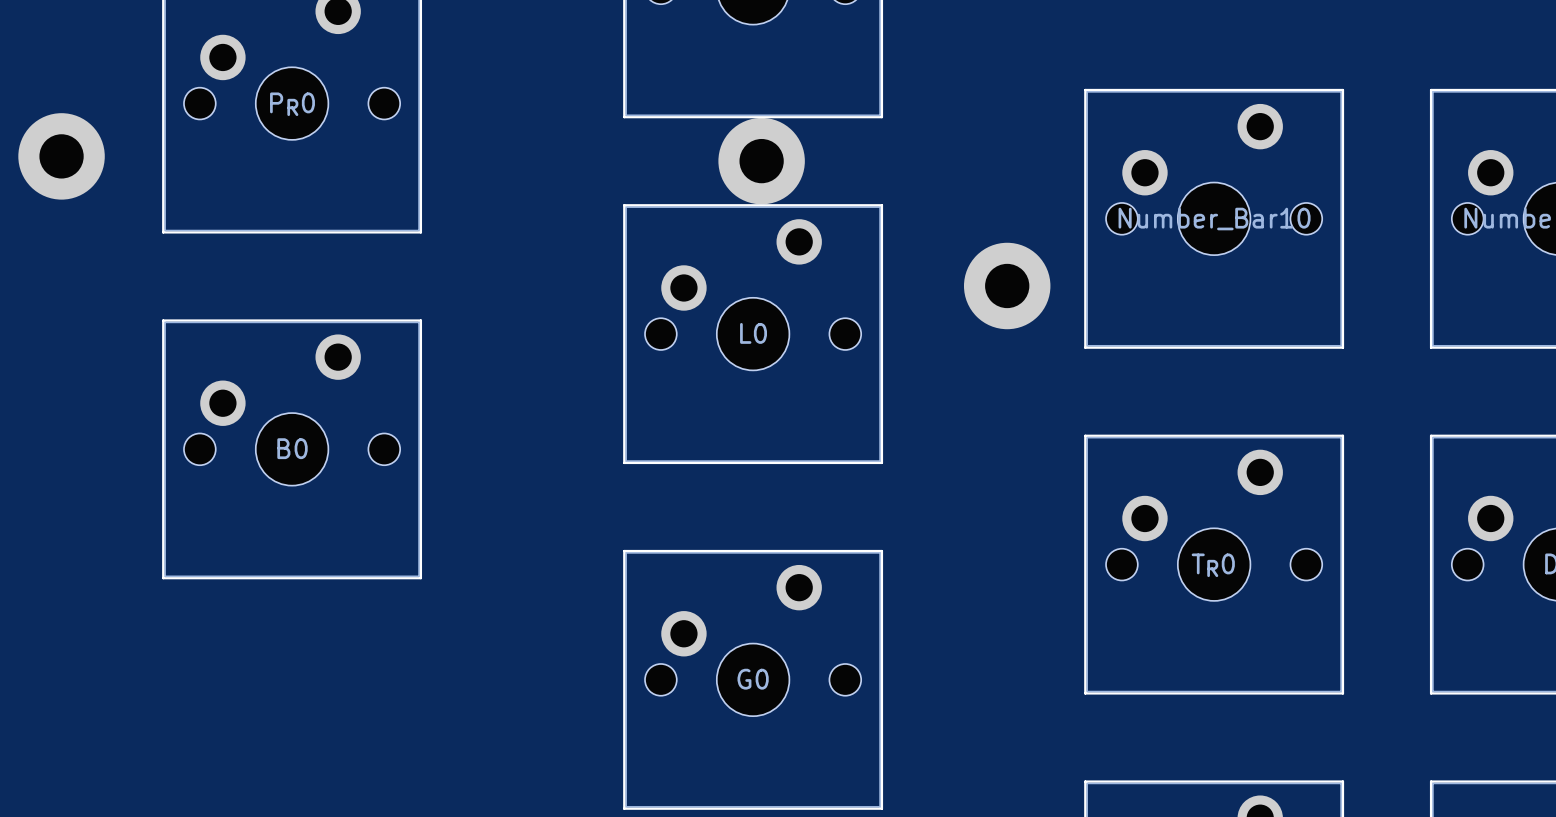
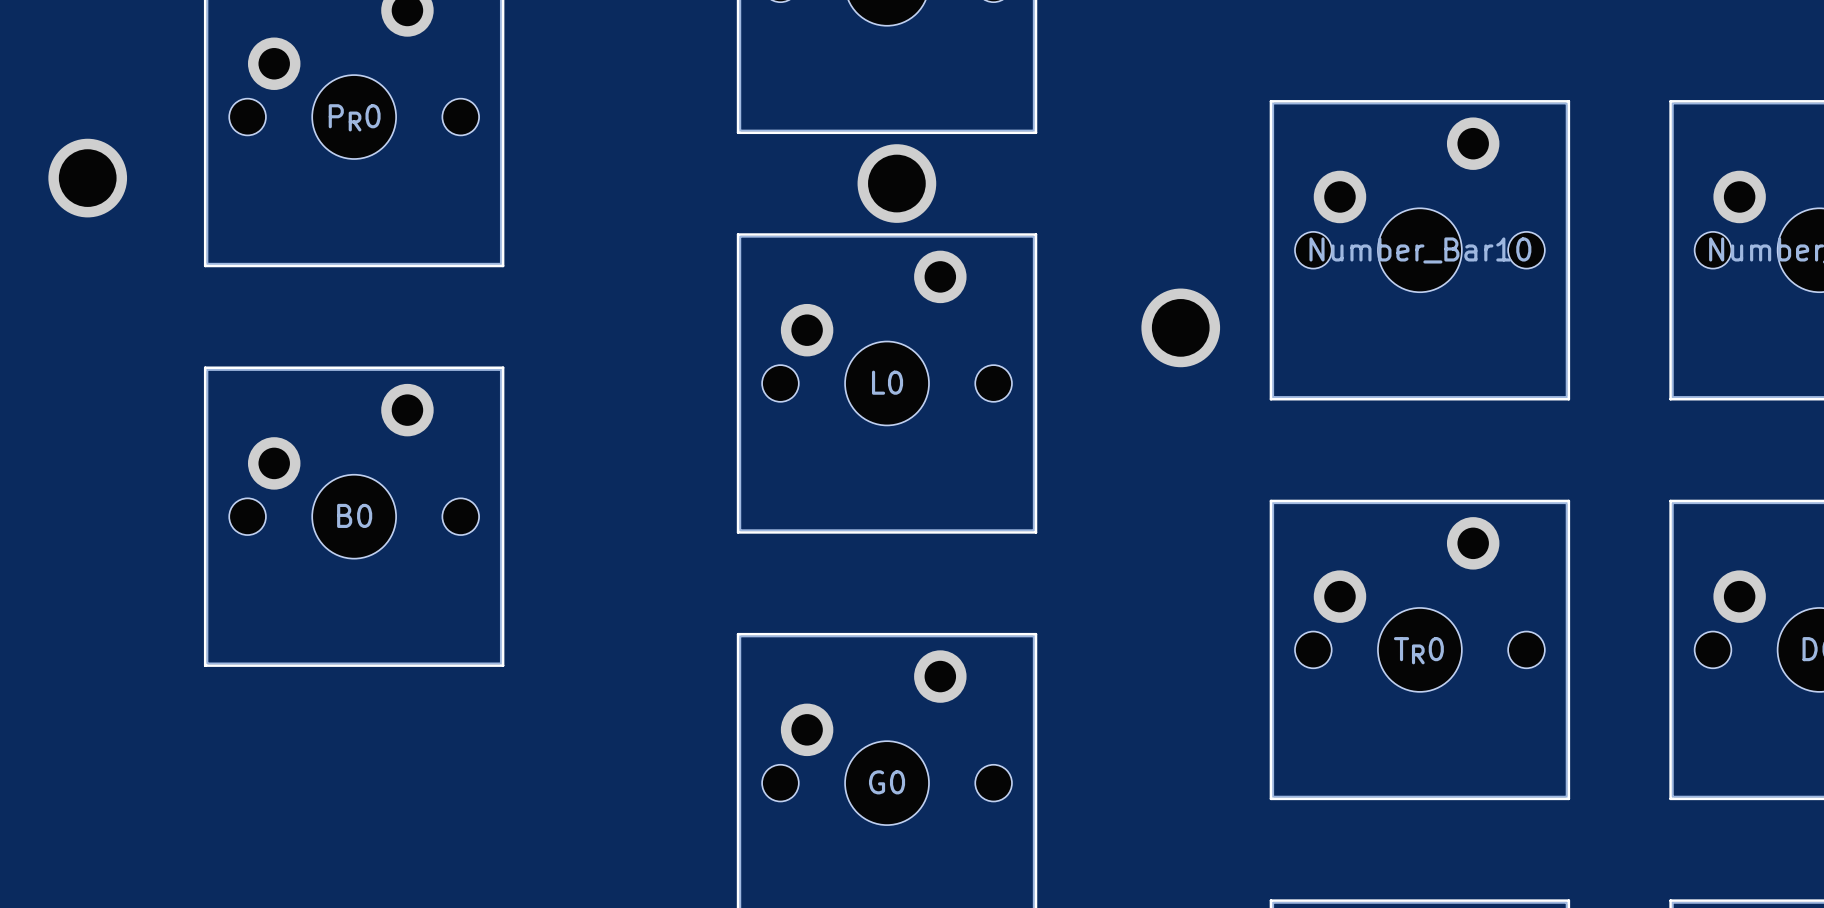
part footprint: [18, 113, 105, 200] -> [48, 138, 128, 218]
part footprint: [718, 117, 805, 205] -> [857, 144, 937, 223]
part footprint: [963, 242, 1051, 330] -> [1141, 288, 1221, 368]

